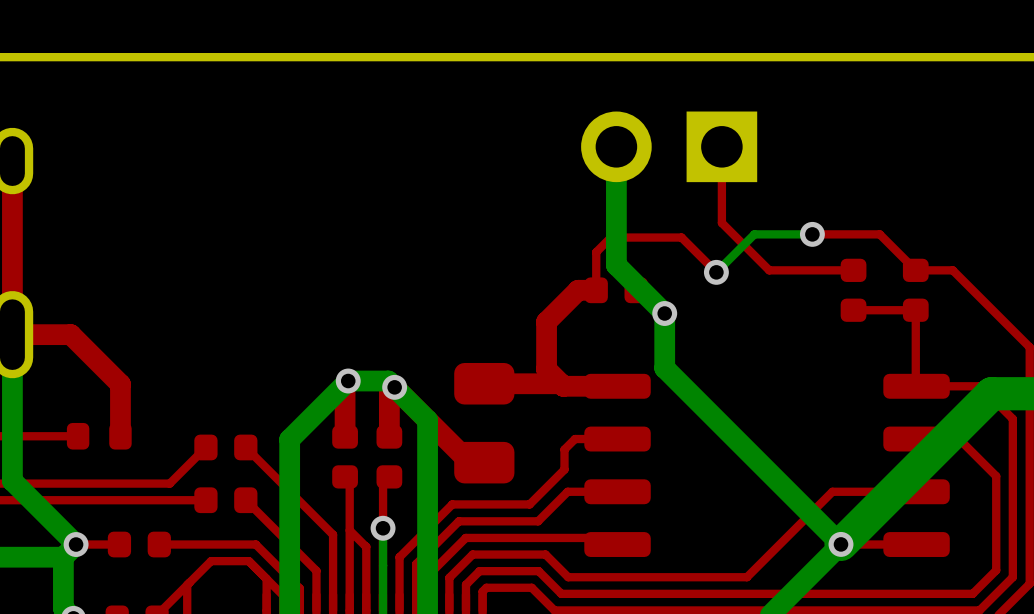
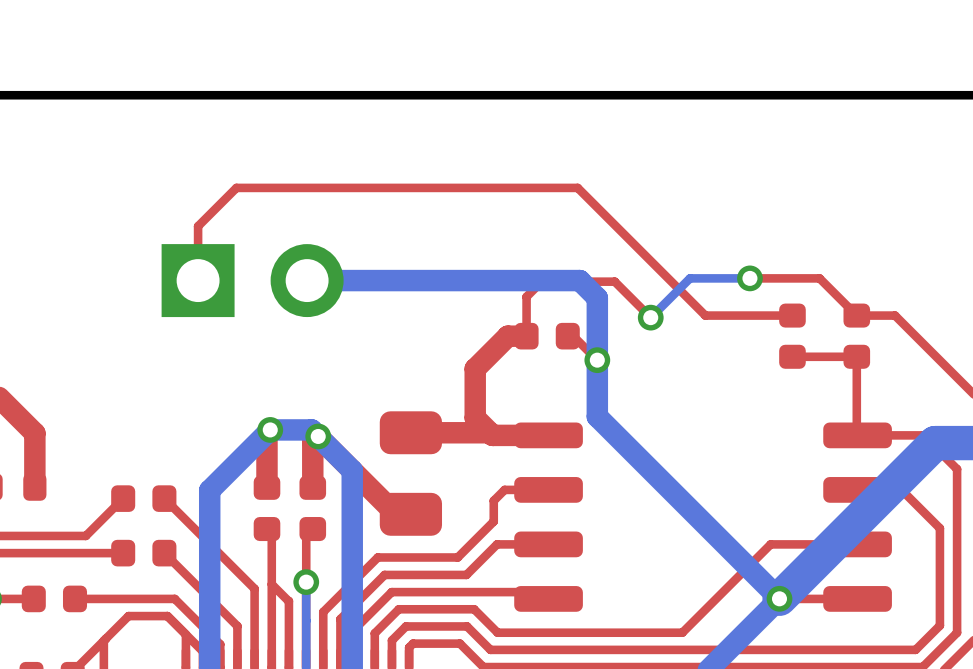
bottom track: (616, 146) (616, 265) (664, 313) -> (307, 280) (579, 280) (597, 298) (597, 360)
part rotation: 0° (669, 146) -> 180° (252, 280)
part position: (669, 146) -> (252, 280)
top track: (721, 146) (721, 222) -> (198, 280) (198, 226) (236, 187) (577, 187) (656, 266)

